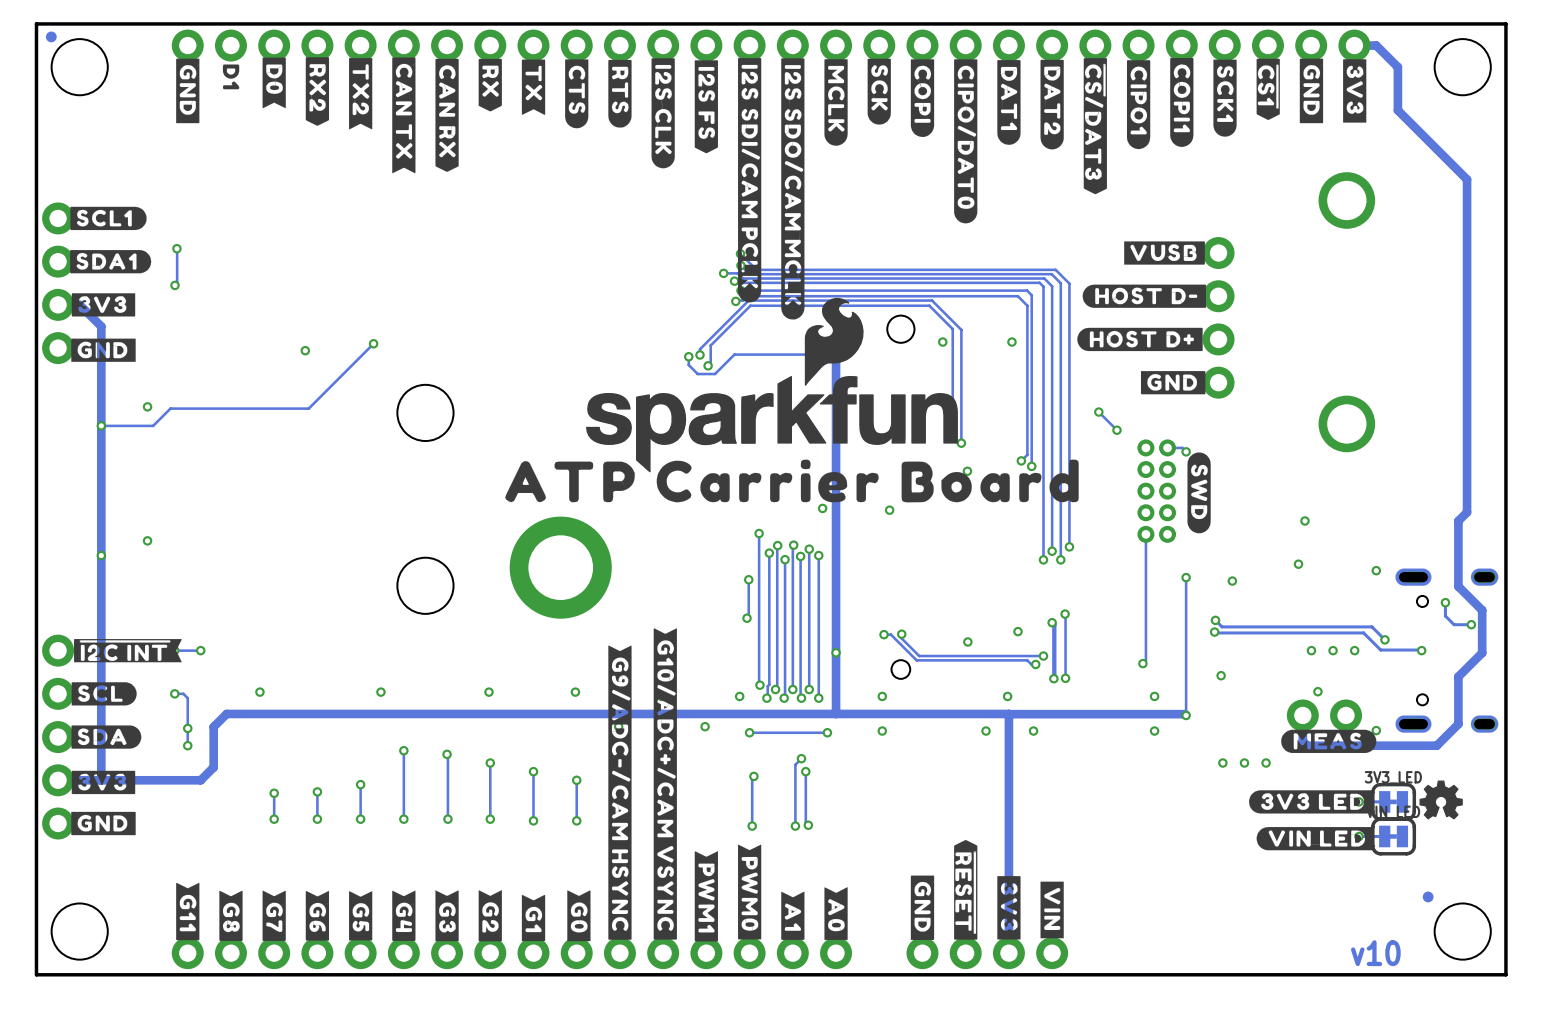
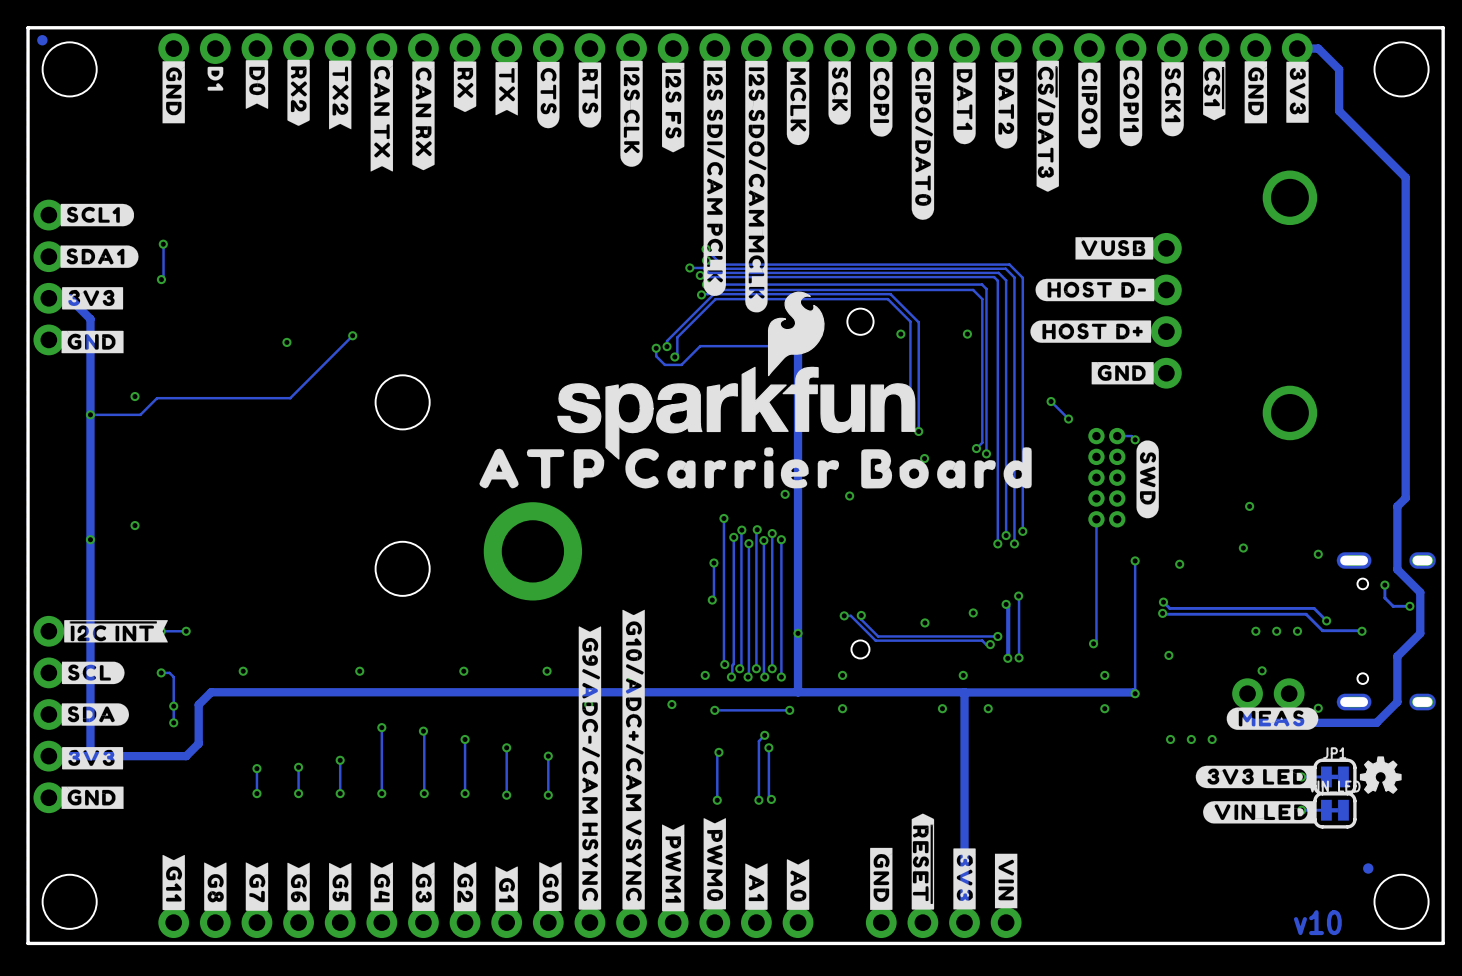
3V3_LED name: 3V3_LED (1393, 777) -> JP1 (1334, 753)

